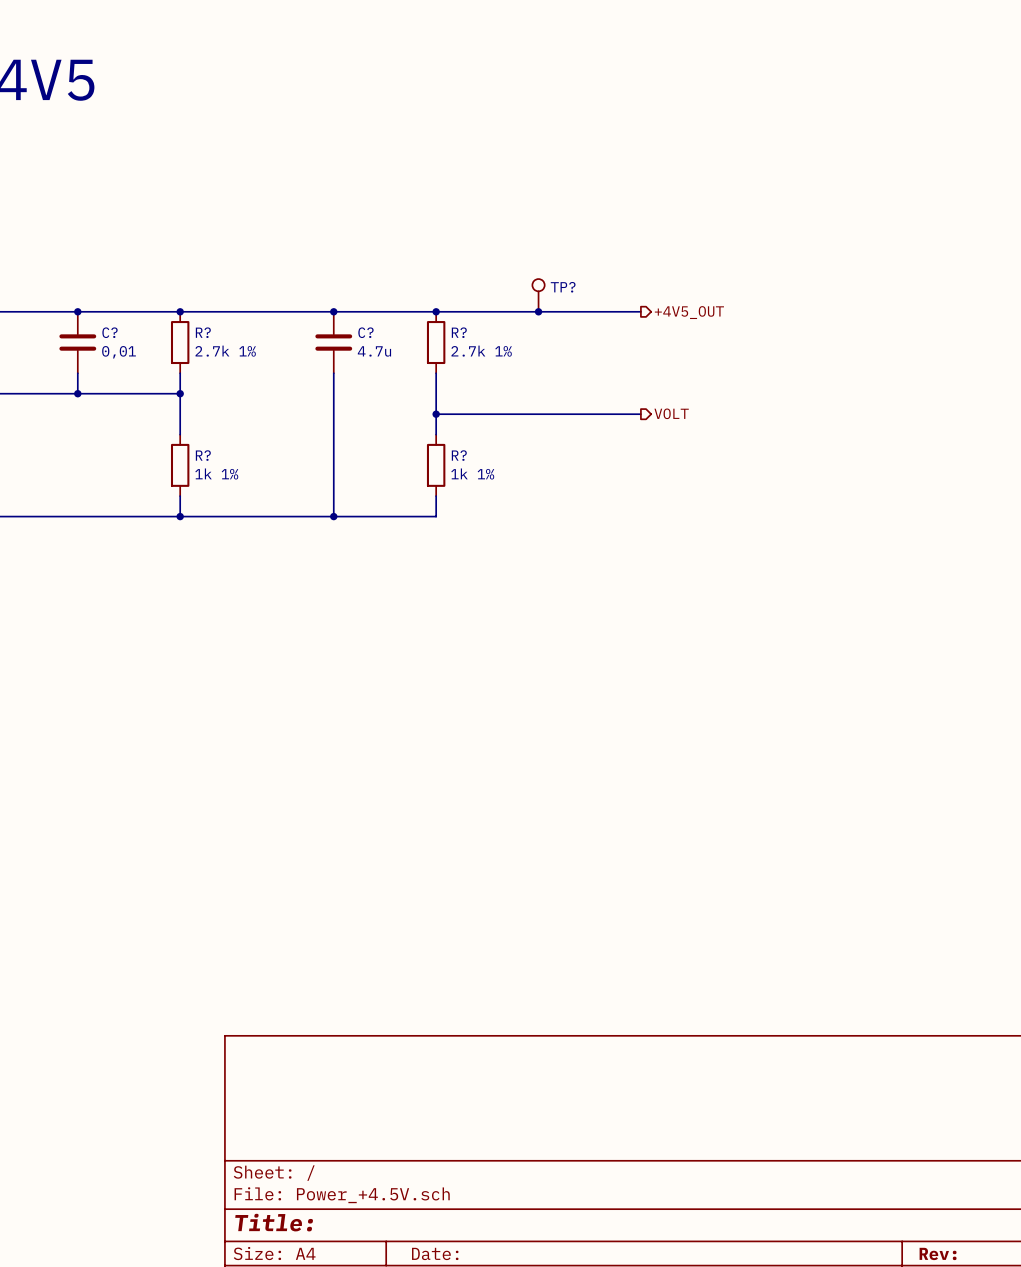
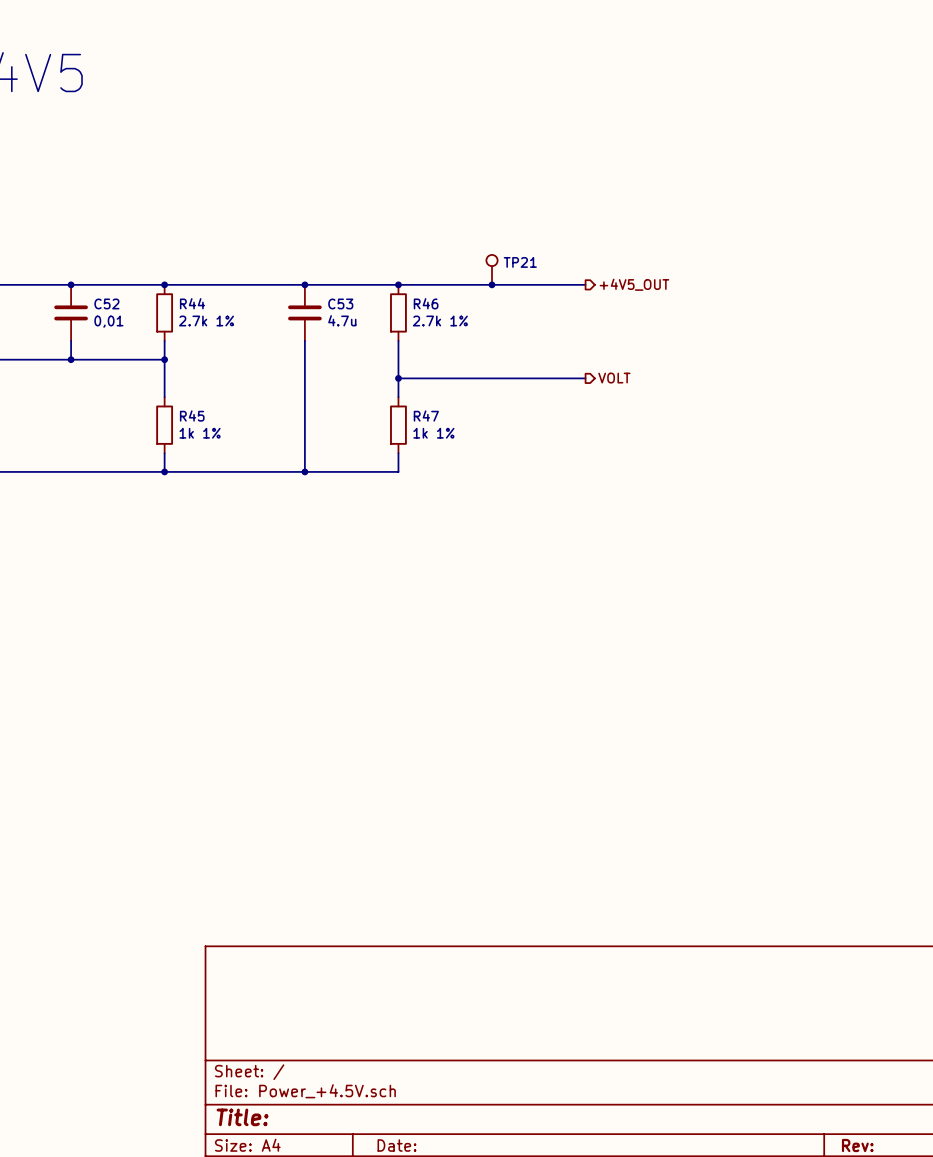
TP? name: TP? (563, 287) -> TP21 (520, 262)
C? name: C? (110, 332) -> C52 (106, 303)
R? name: R? (203, 332) -> R44 (192, 303)
C? name: C? (365, 332) -> C53 (340, 303)
R? name: R? (459, 332) -> R46 (426, 303)
R? name: R? (203, 455) -> R45 (192, 415)
R? name: R? (459, 455) -> R47 (426, 415)

